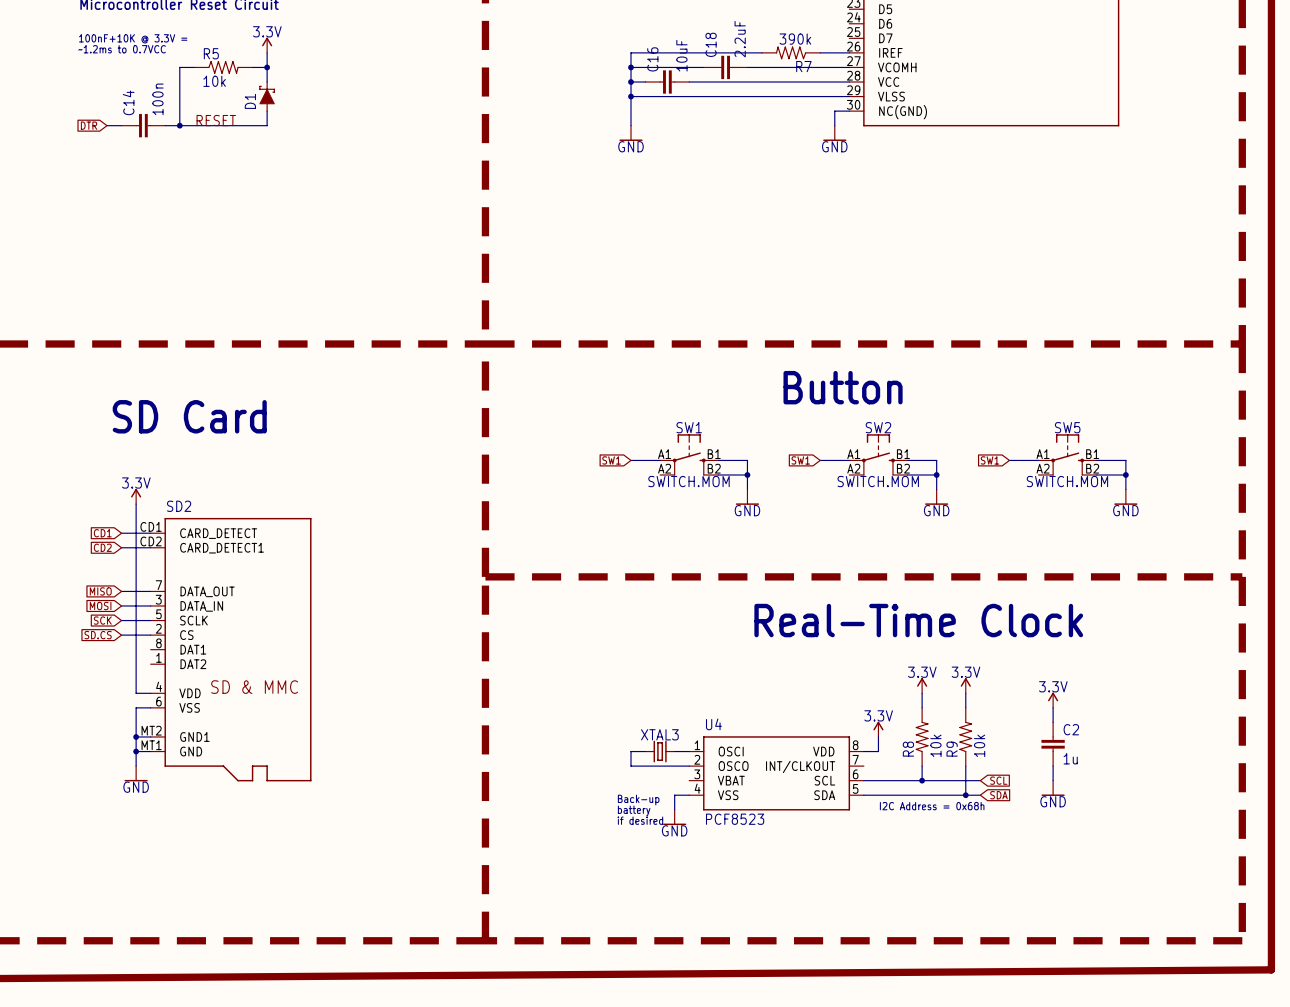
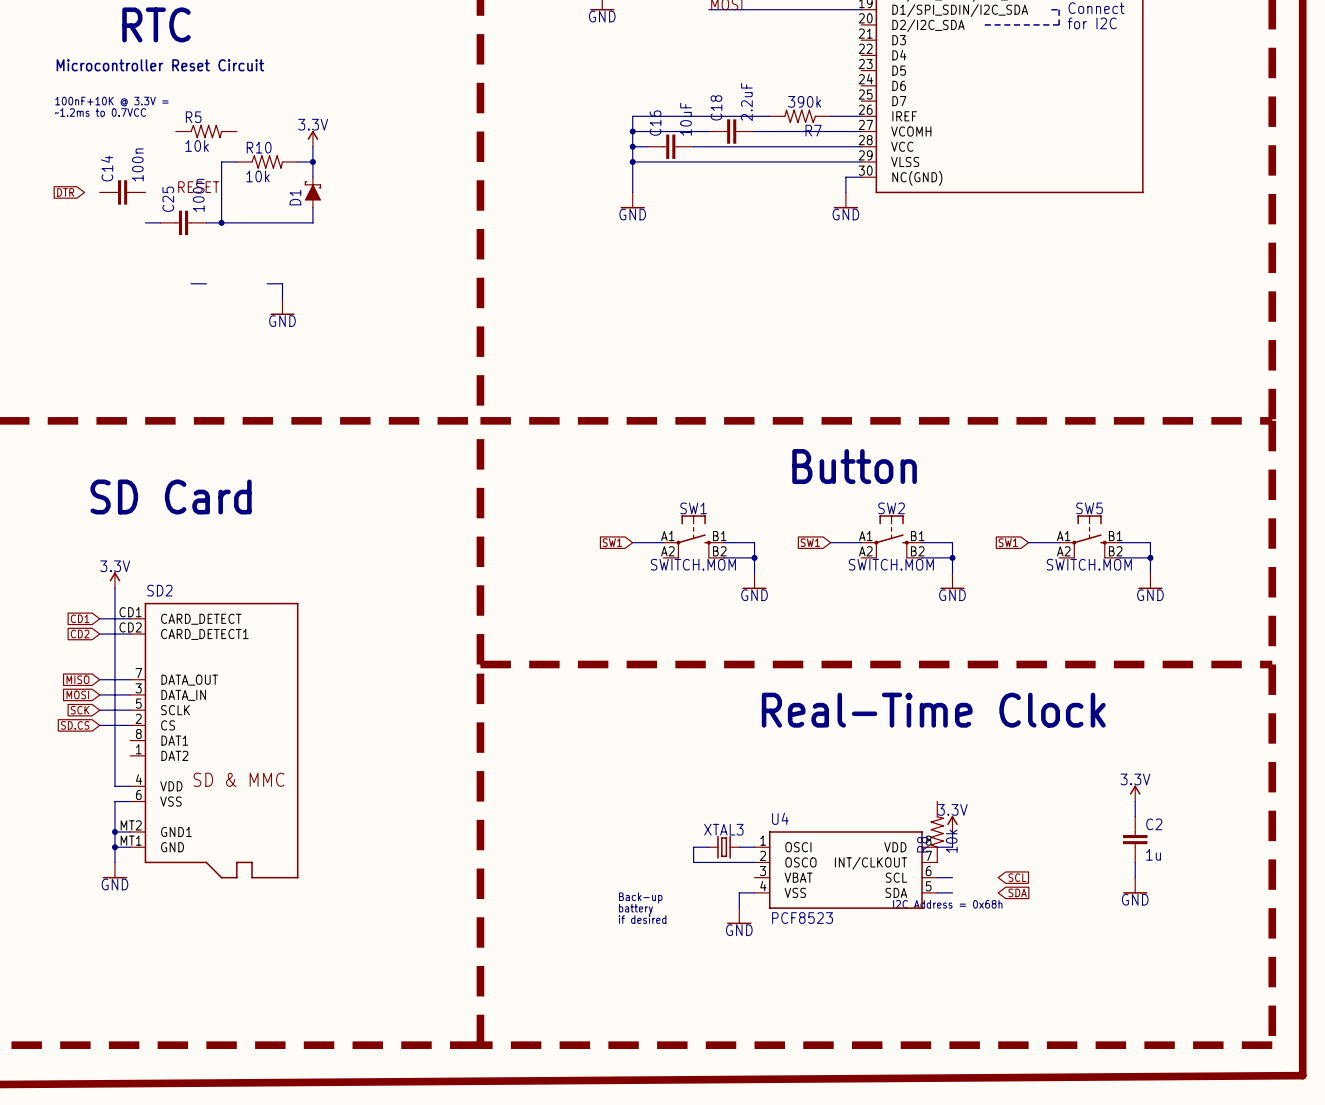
power symbol position: 3.3V (267, 45) -> 3.3V (312, 138)
wire: (267, 52) (267, 82) -> (312, 146) (312, 177)
wire: (194, 67) (179, 67) (179, 125) -> (236, 161) (221, 161) (221, 222)
wire: (252, 67) (267, 67) -> (297, 161) (312, 161)
junction: (267, 67) -> none
D1 position: (267, 96) -> (312, 192)
R10: none -> 10k (267, 161)
junction: none -> (312, 161)
wire: (267, 111) (267, 125) (165, 125) -> (312, 207) (312, 222) (206, 222)
wire: (107, 125) (121, 125) -> (145, 222) (160, 222)
junction: (179, 125) -> none
C25: none -> 100n (183, 222)
junction: none -> (221, 222)
wire: none -> (191, 283) (206, 283)
wire: none -> (267, 283) (282, 283) (282, 299)
power symbol: none -> GND (282, 307)
power symbol: 3.3V (922, 685) -> none
power symbol: 3.3V (965, 685) -> none
wire: (922, 693) (922, 707) -> none
wire: (965, 693) (965, 707) -> none
power symbol position: 3.3V (1053, 700) -> 3.3V (1135, 793)
wire: (1053, 707) (1053, 722) -> (1135, 801) (1135, 816)
power symbol: 3.3V (878, 729) -> none
power symbol: none -> 3.3V (952, 824)
wire: (878, 736) (878, 751) (863, 751) -> (952, 831) (952, 847) (937, 847)
R9: 10k (965, 736) -> none
C2 position: (1053, 744) -> (1135, 839)
wire: (645, 751) (631, 751) (631, 766) (689, 766) -> (708, 847) (693, 847) (693, 862) (754, 862)
XTAL3 position: (660, 751) -> (724, 847)
wire: (674, 751) (689, 751) -> (739, 847) (754, 847)
wire: (922, 766) (922, 780) (863, 780) -> none
wire: (965, 766) (965, 795) -> none
wire: (1053, 766) (1053, 780) -> (1135, 862) (1135, 877)
U4 position: (776, 773) -> (845, 870)
junction: (922, 780) -> none
wire: (936, 780) (980, 780) -> none
power symbol position: GND (1053, 788) -> GND (1135, 885)
wire: (689, 795) (674, 795) (674, 809) -> (754, 892) (739, 892) (739, 908)
wire: (863, 795) (922, 795) -> none
wire: (936, 795) (980, 795) -> none
junction: (965, 795) -> none
power symbol position: GND (674, 817) -> GND (739, 916)

